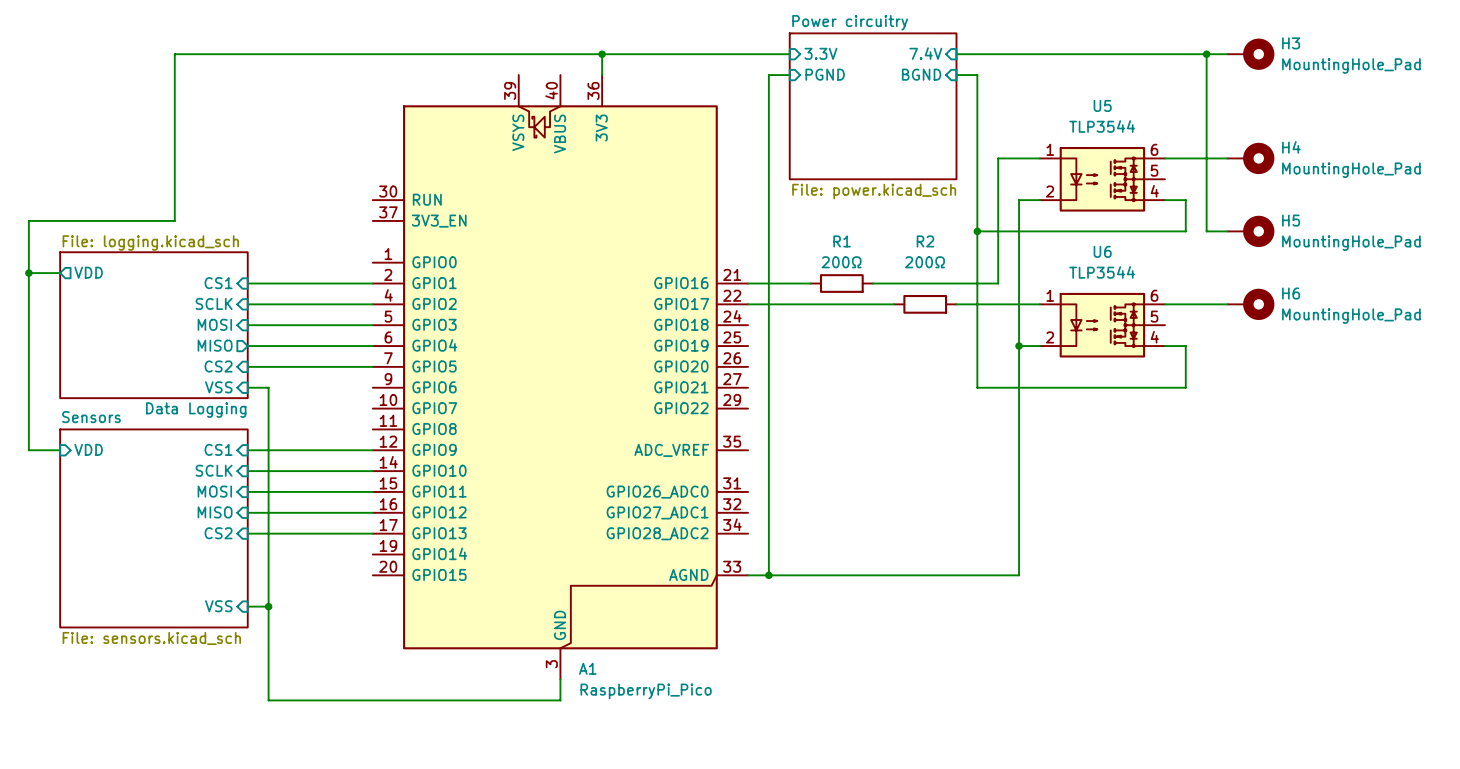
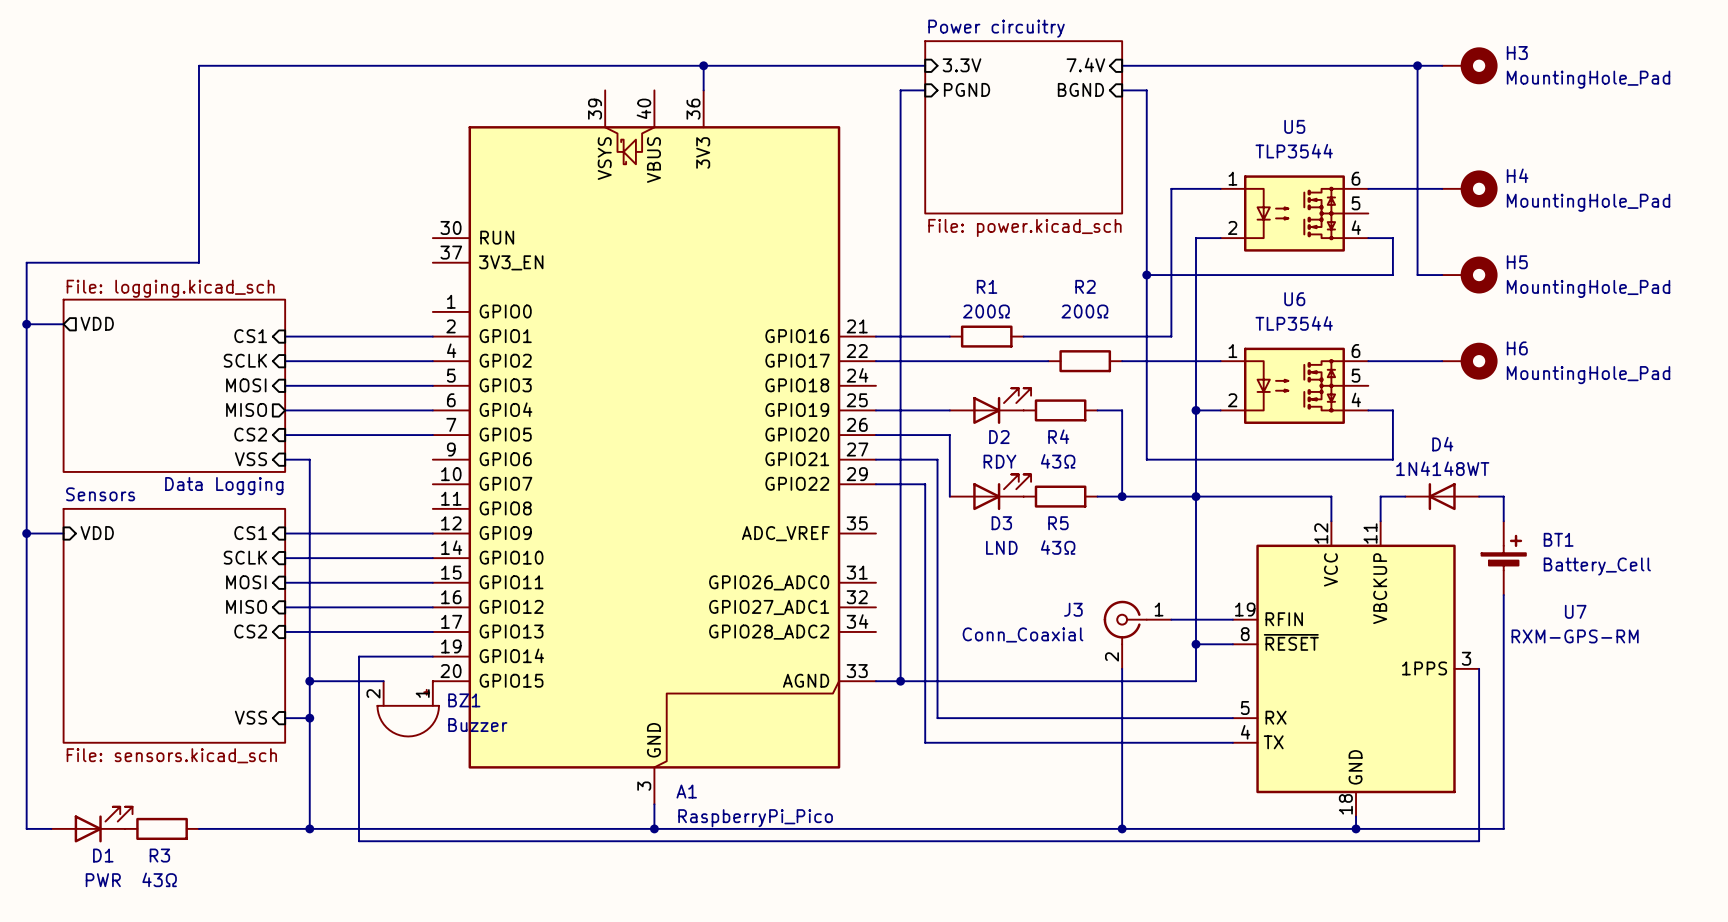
D2: none -> RDY (990, 406)
wire: none -> (875, 410) (949, 410)
R4: none -> 43Ω (1060, 410)
wire: none -> (1097, 410) (1122, 410) (1122, 496)
wire: none -> (875, 435) (949, 435) (949, 496)
wire: none -> (875, 459) (937, 459) (937, 718) (1232, 718)
wire: none -> (875, 484) (925, 484) (925, 742) (1232, 742)
D3: none -> LND (990, 492)
R5: none -> 43Ω (1060, 496)
wire: none -> (1097, 496) (1331, 496) (1331, 521)
junction: none -> (1122, 496)
junction: none -> (1196, 496)
wire: none -> (1405, 496) (1380, 496) (1380, 521)
D4: none -> 1N4148WT (1442, 496)
wire: none -> (1479, 496) (1503, 496) (1503, 521)
wire: none -> (26, 533) (26, 828) (51, 828)
junction: none -> (26, 533)
BT1: none -> Battery_Cell (1503, 558)
wire: none -> (1503, 595) (1503, 828) (654, 828)
wire: none -> (1171, 619) (1232, 619)
J3: none -> Conn_Coaxial (1137, 634)
wire: none -> (1196, 644) (1232, 644)
junction: none -> (1196, 644)
wire: none -> (432, 656) (359, 656) (359, 841) (1479, 841) (1479, 668)
wire: none -> (1122, 668) (1122, 828)
U7: none -> RXM-GPS-RM (1356, 668)
wire: none -> (309, 681) (383, 681)
junction: none -> (309, 681)
BZ1: none -> Buzzer (408, 708)
wire: none -> (1356, 816) (1356, 828)
D1: none -> PWR (91, 824)
R3: none -> 43Ω (162, 828)
wire: none -> (198, 828) (309, 828)
junction: none -> (309, 828)
junction: none -> (654, 828)
junction: none -> (1122, 828)
junction: none -> (1356, 828)

